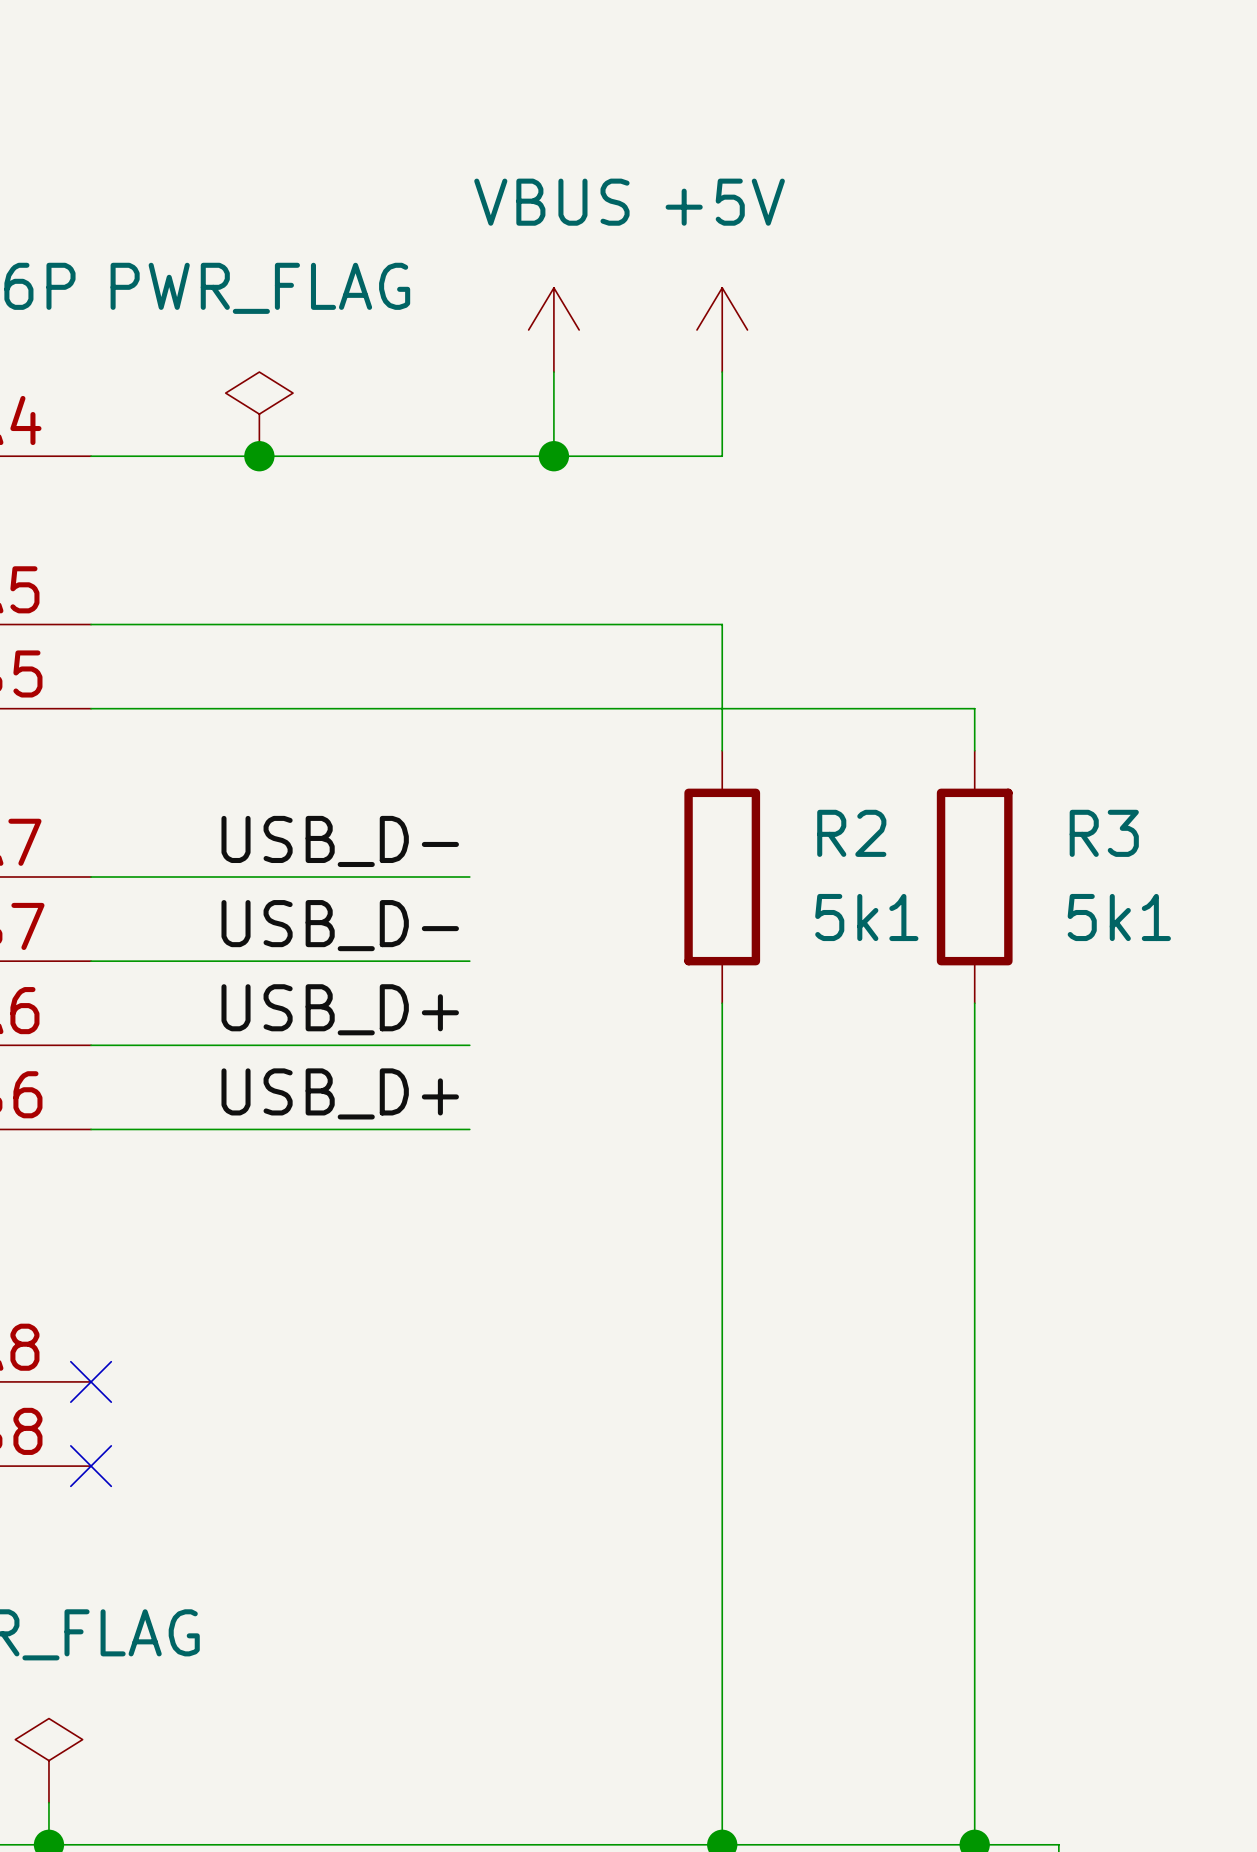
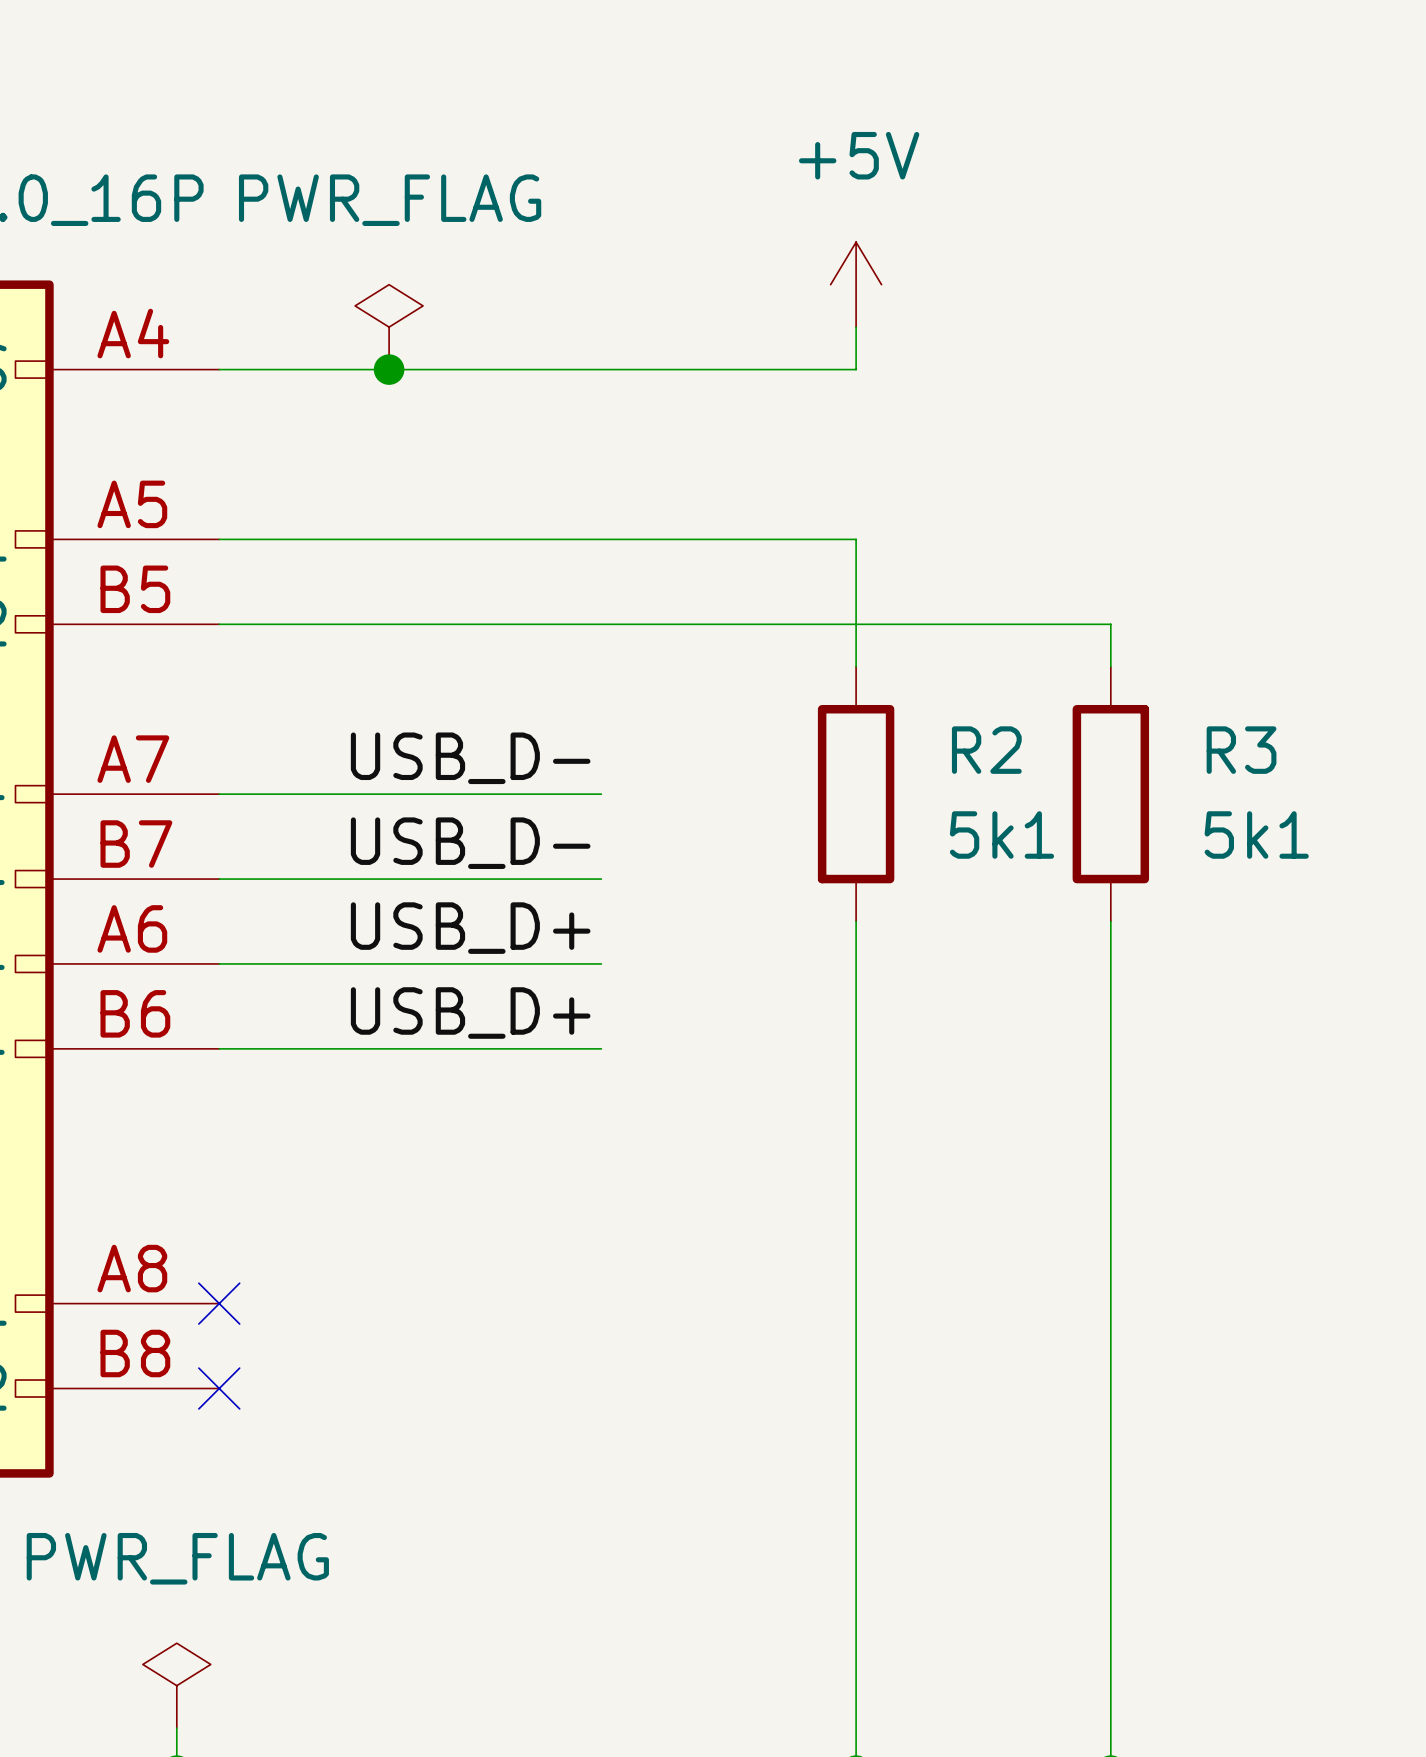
power symbol: VBUS (553, 329) -> none
power symbol position: +5V (722, 329) -> +5V (856, 284)
wire: (553, 372) (553, 456) -> none
junction: (553, 456) -> none

